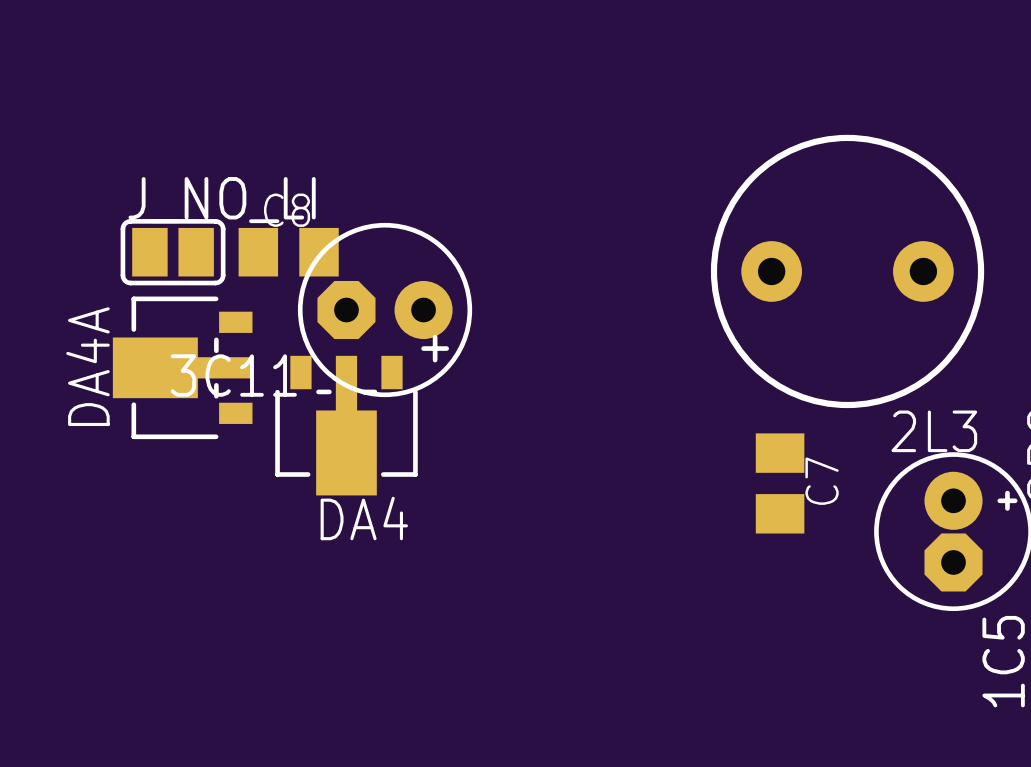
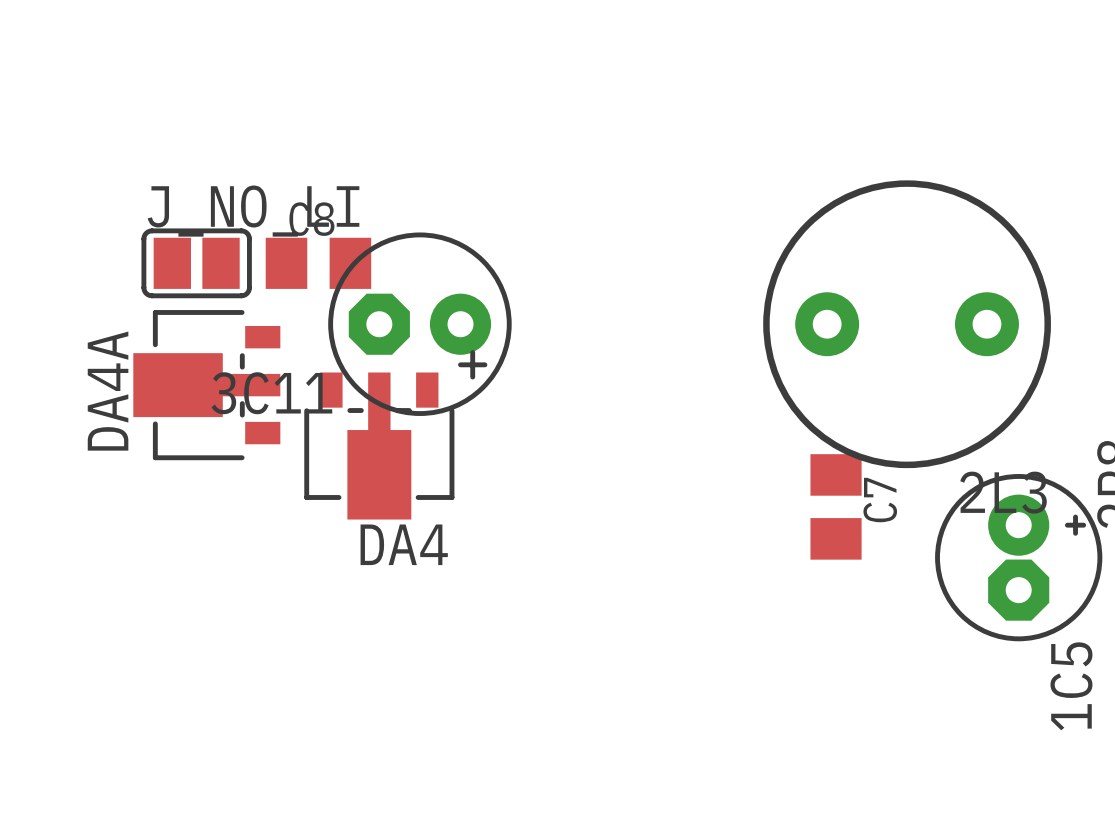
2L3 position: (847, 271) -> (907, 324)

